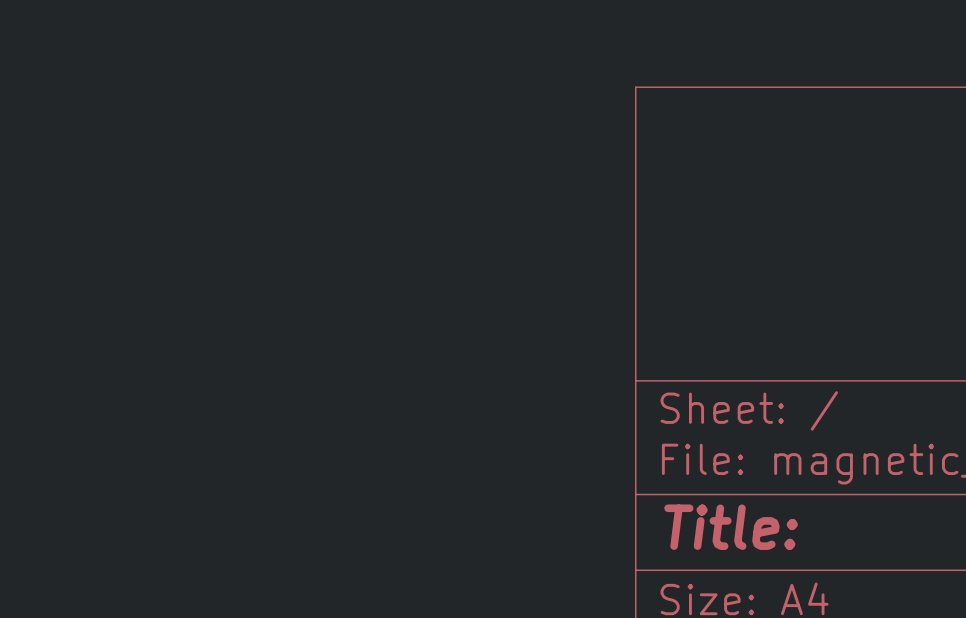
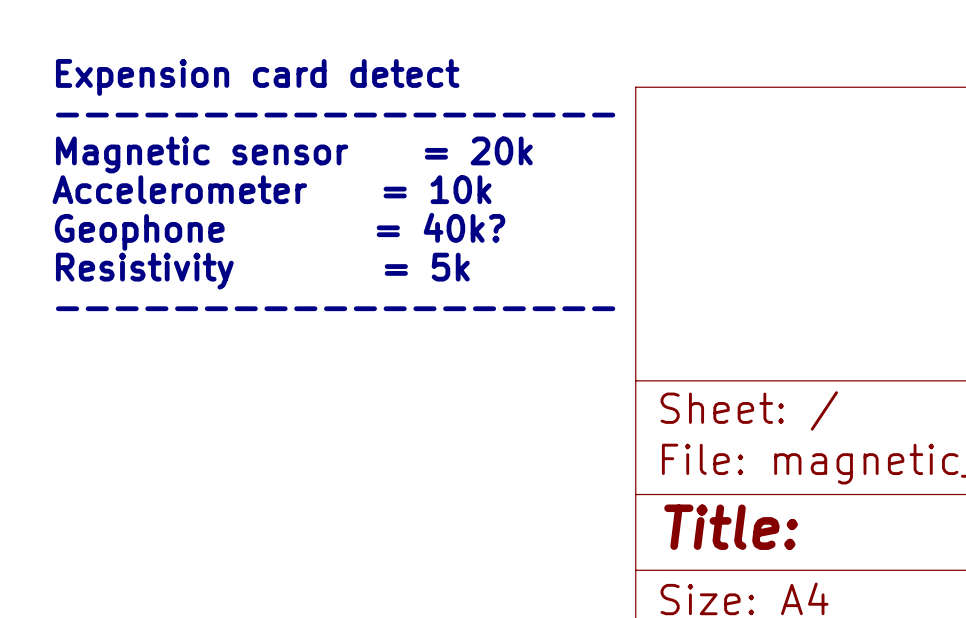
text: none -> Expension card detect (257, 77)
text: none -> ------------------- (335, 115)
text: none -> Magnetic sensor = 20k (294, 154)
text: none -> Accelerometer = 10k (272, 189)
text: none -> Geophone = 40k? (280, 231)
text: none -> Resistivity = 5k (262, 271)
text: none -> ------------------- (335, 308)

